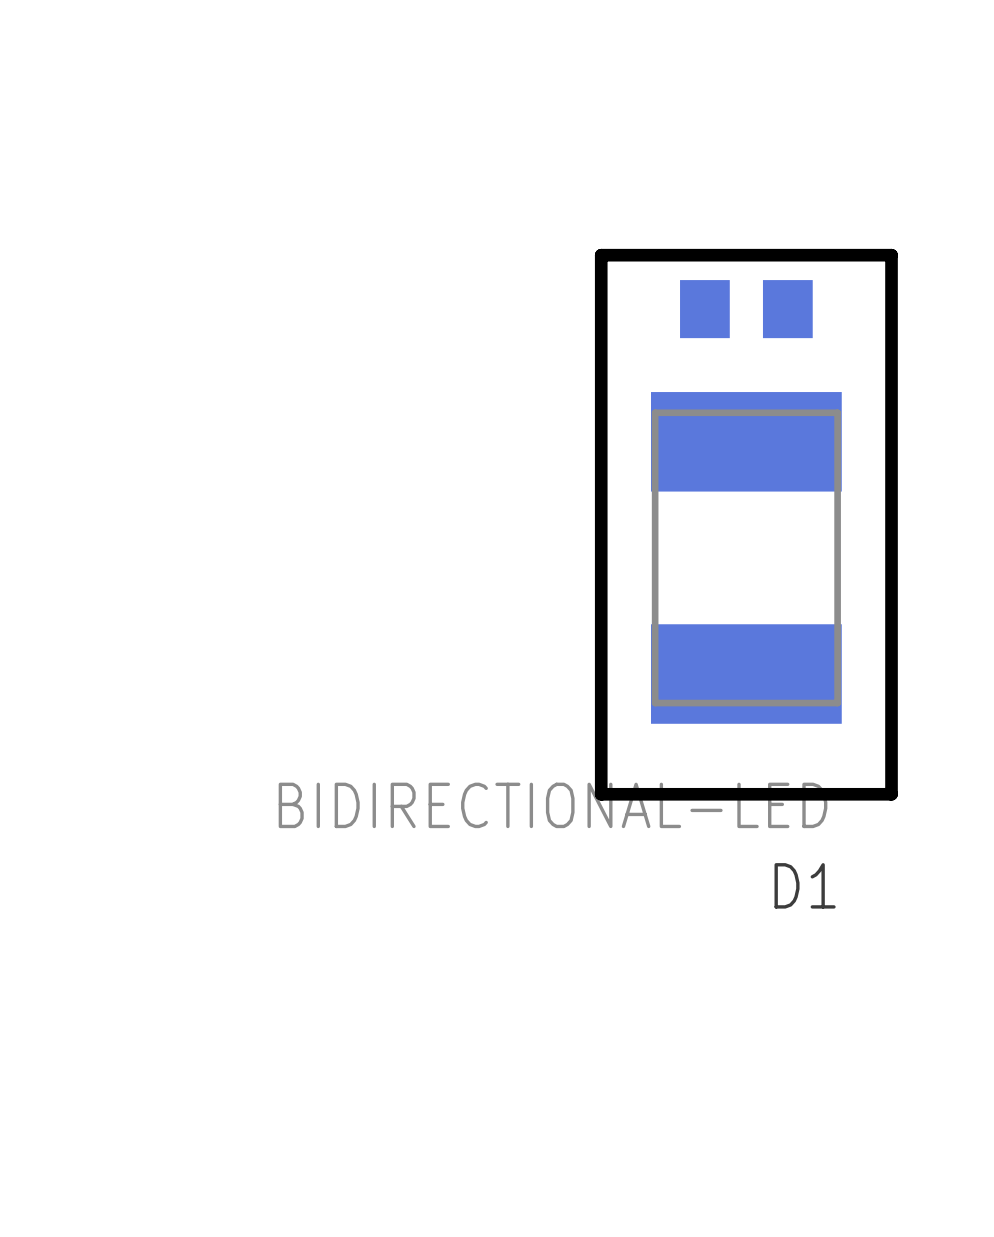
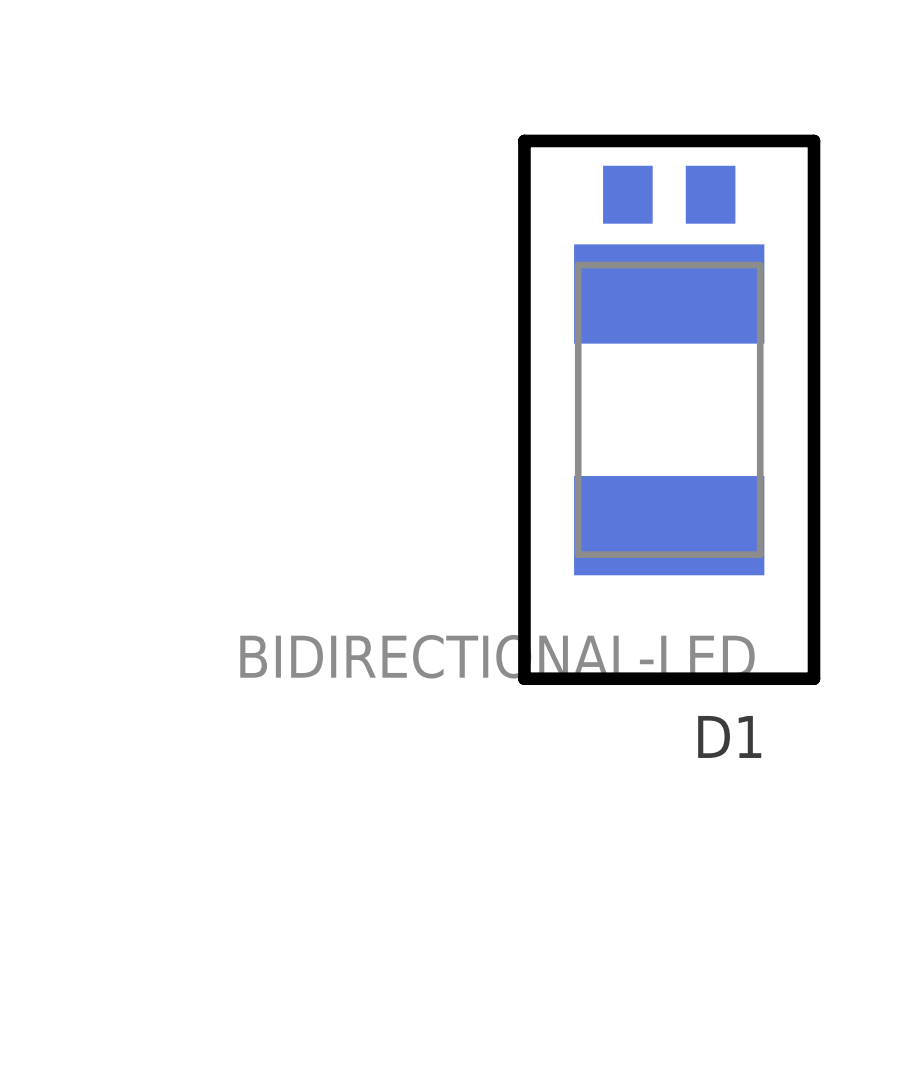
D1 position: (746, 557) -> (669, 409)

